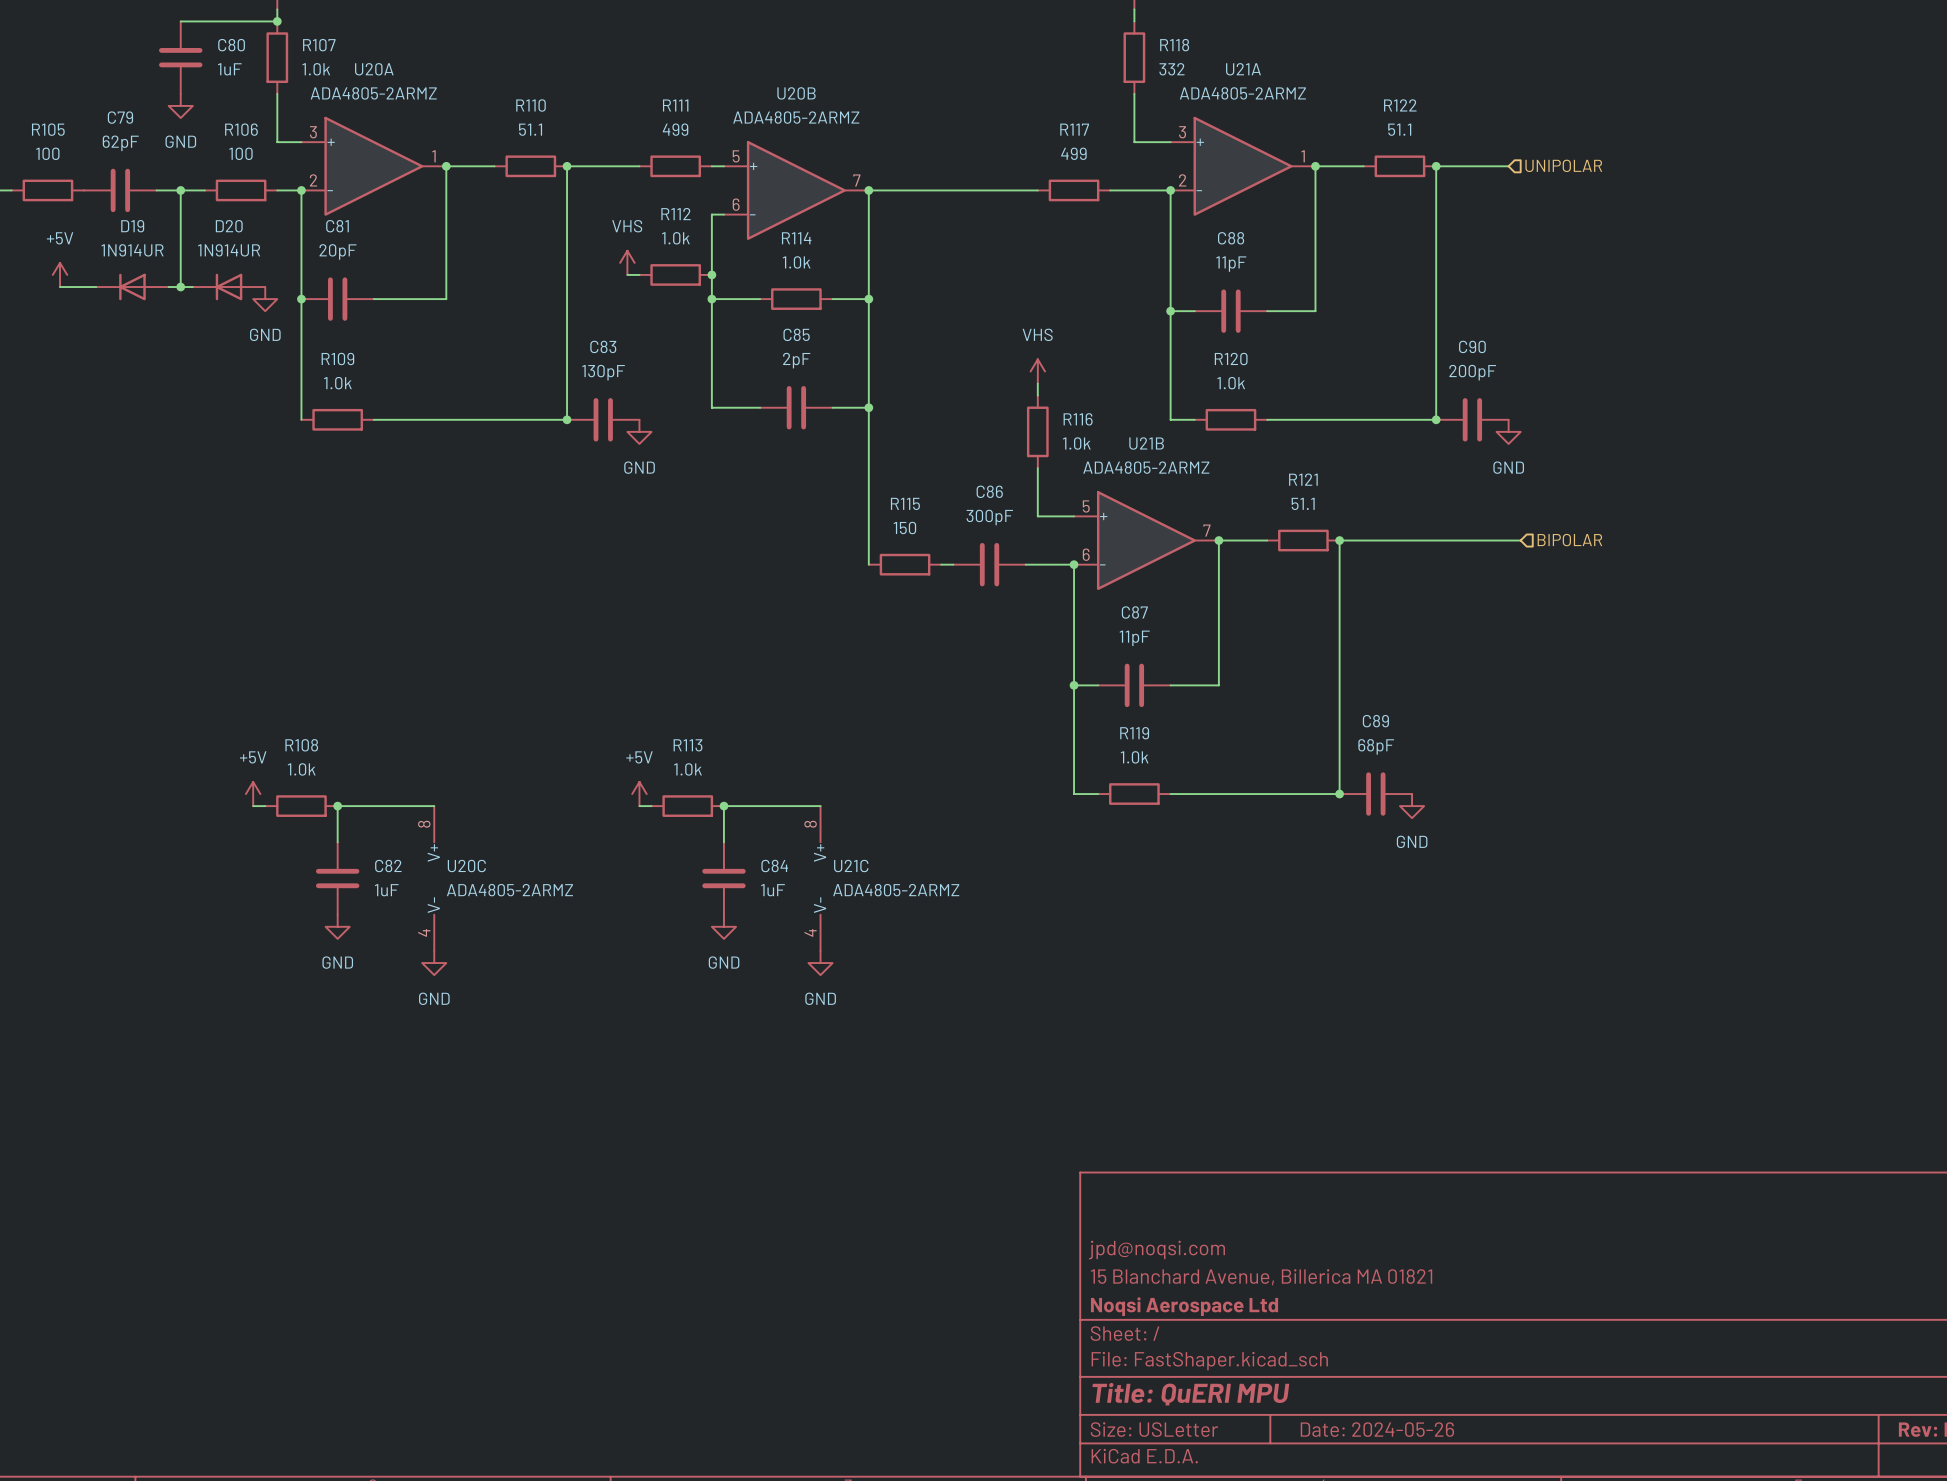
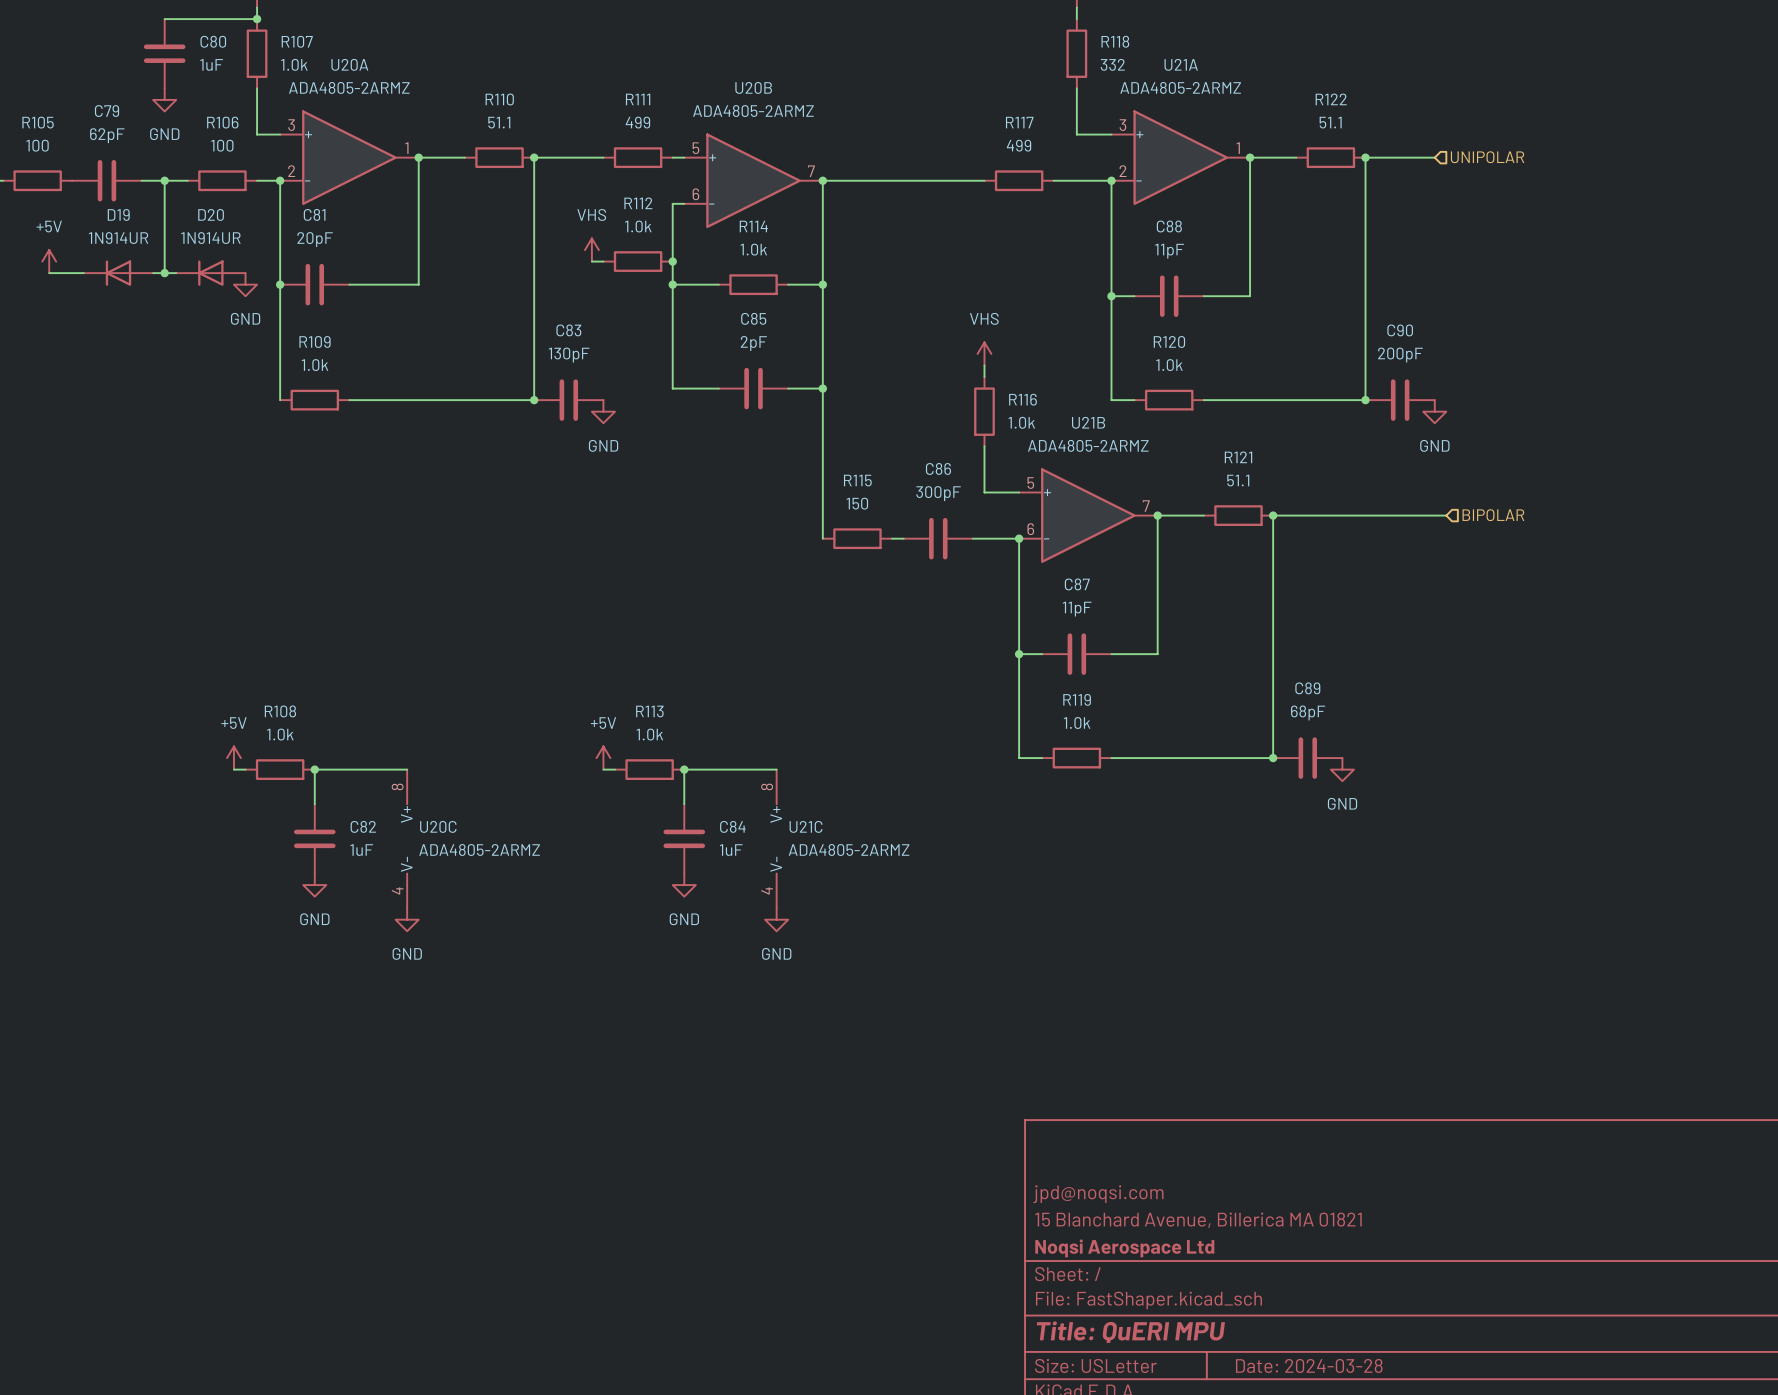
title block: Date: 2024-05-26 (1377, 1429) -> Date: 2024-03-28 (1309, 1365)

